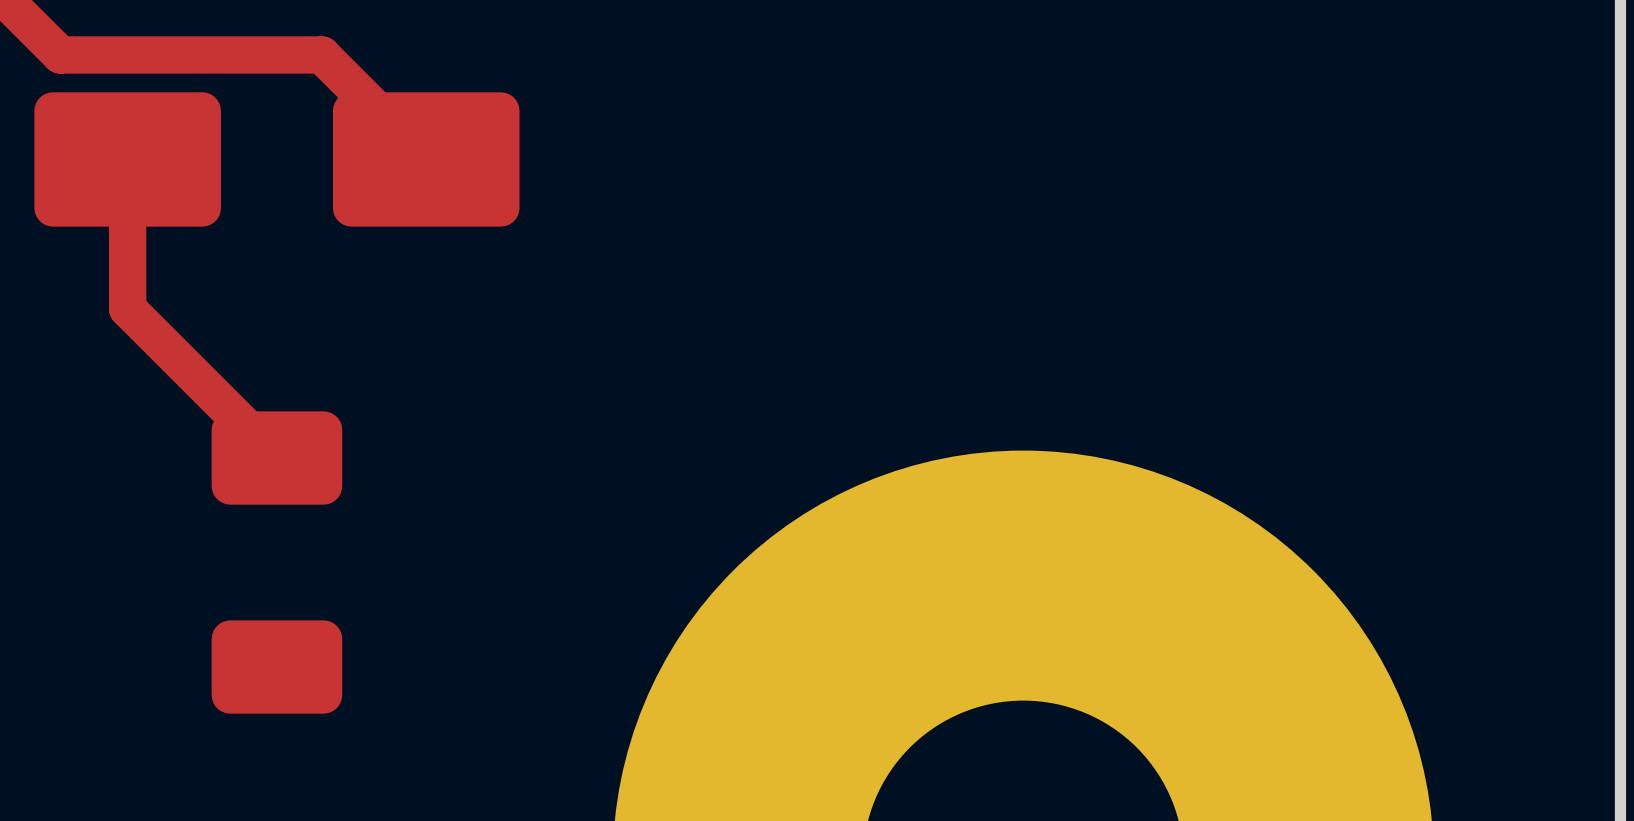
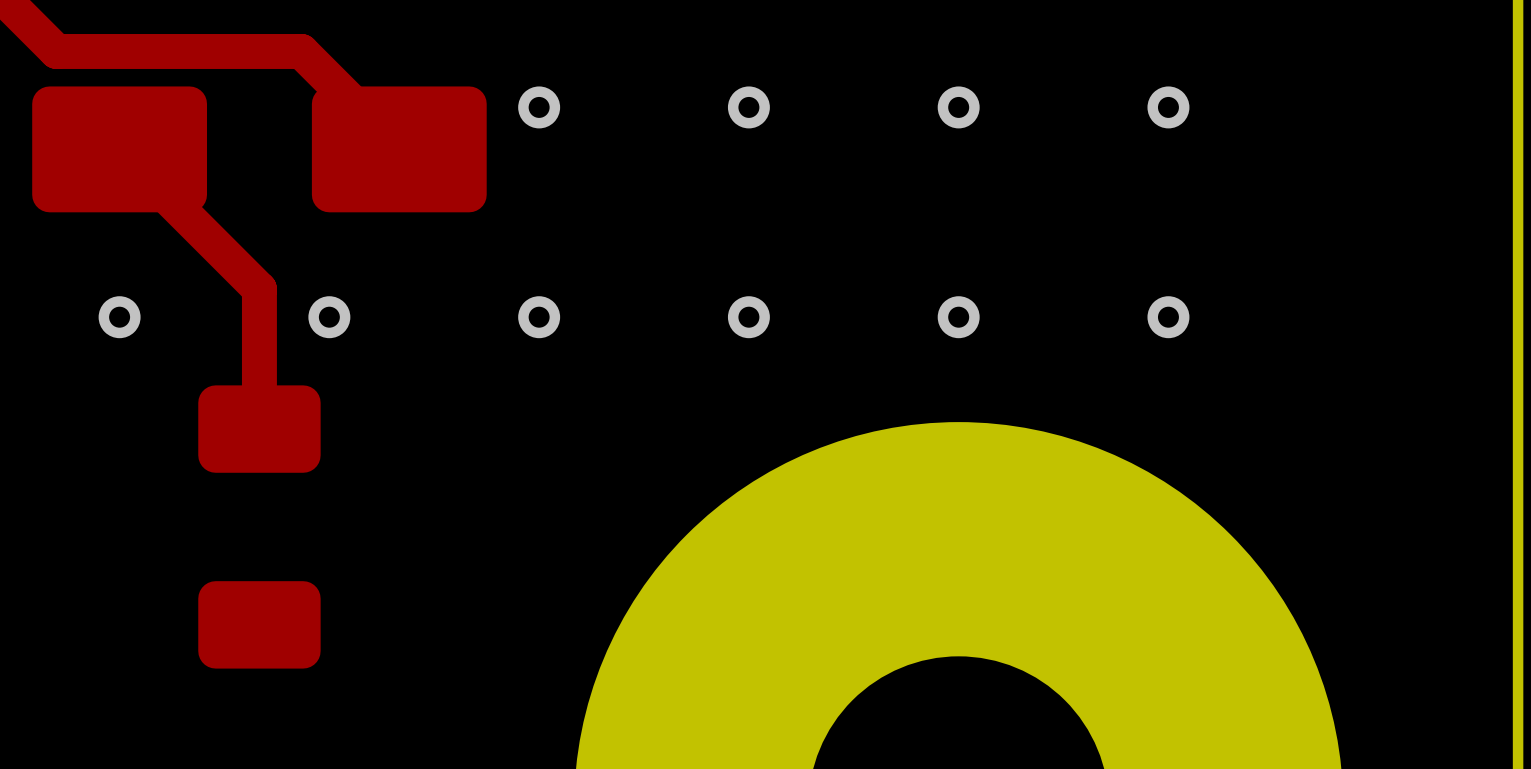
via: none -> (539, 107)
via: none -> (748, 107)
via: none -> (958, 107)
via: none -> (1168, 107)
top track: (127, 159) (127, 308) (276, 458) -> (119, 149) (259, 289) (259, 429)
via: none -> (119, 317)
via: none -> (329, 317)
via: none -> (539, 317)
via: none -> (748, 317)
via: none -> (958, 317)
via: none -> (1168, 317)

